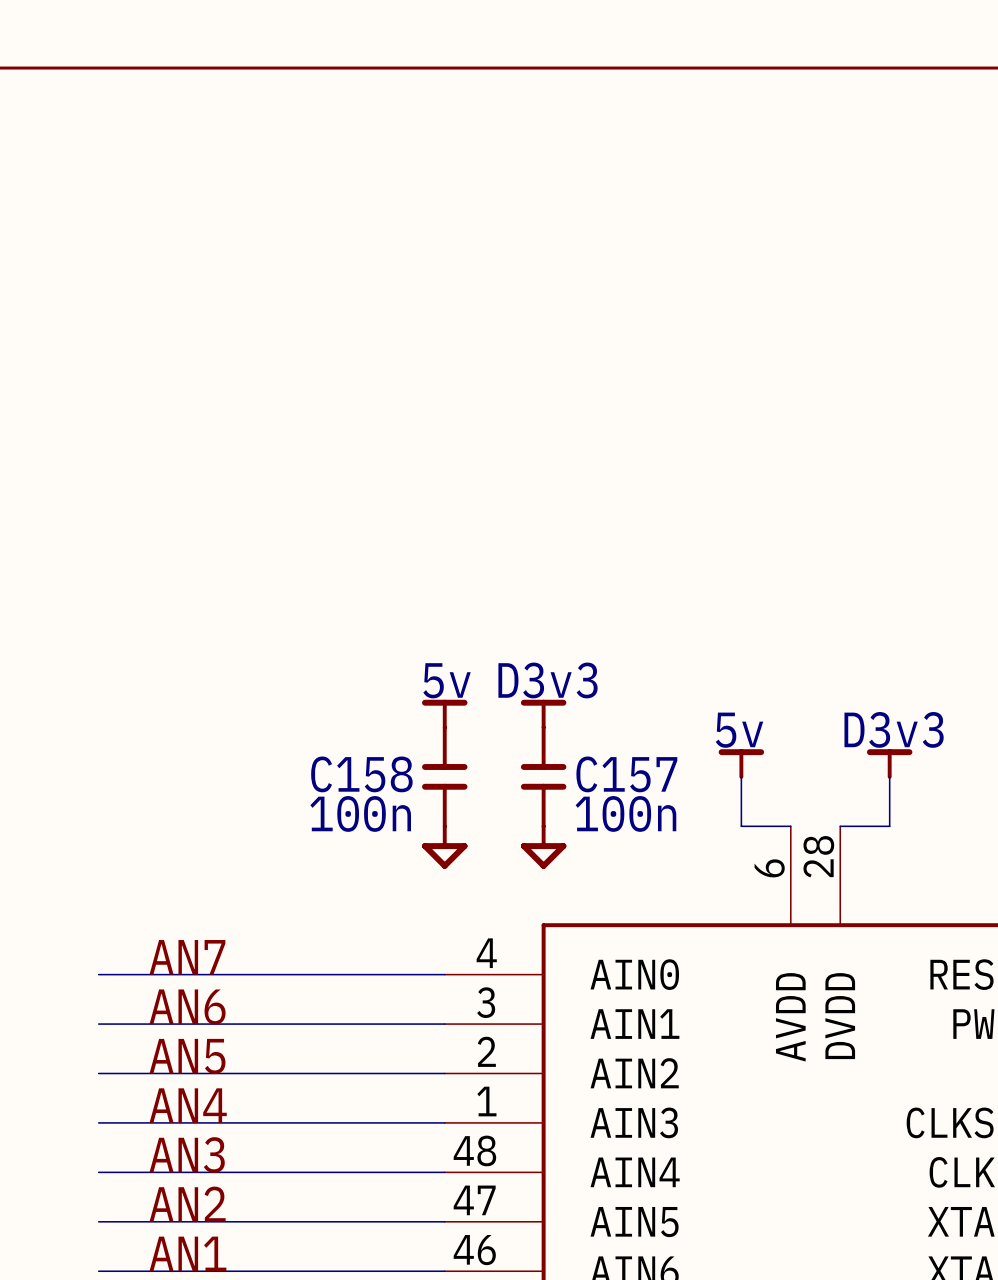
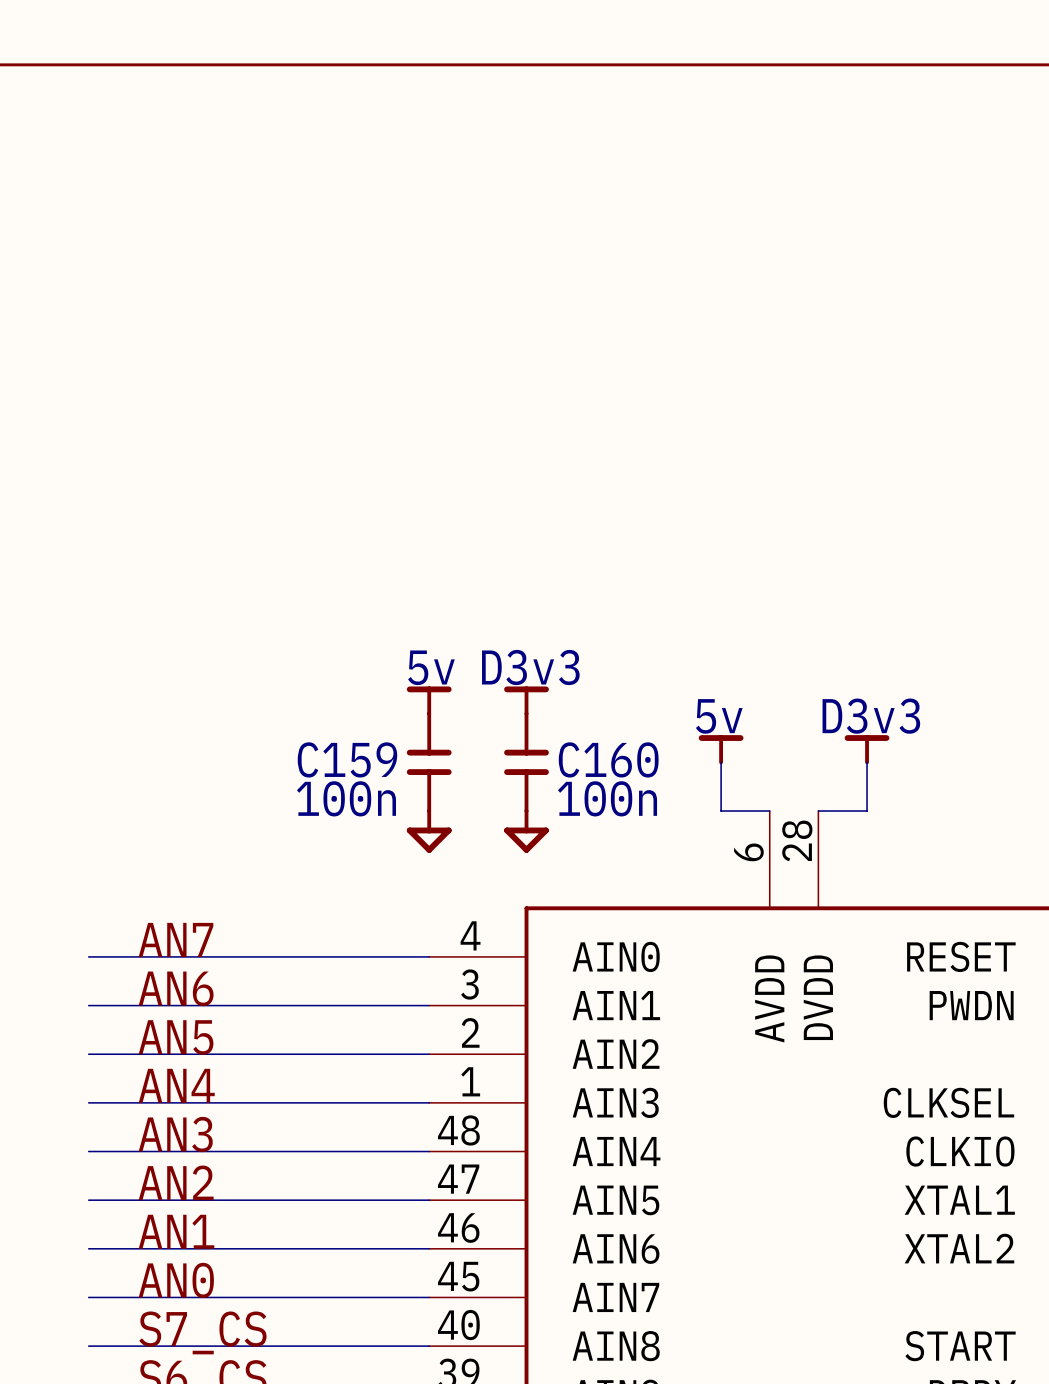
C158 name: C158 (361, 774) -> C159 (347, 759)
C157 name: C157 (626, 774) -> C160 (608, 759)

